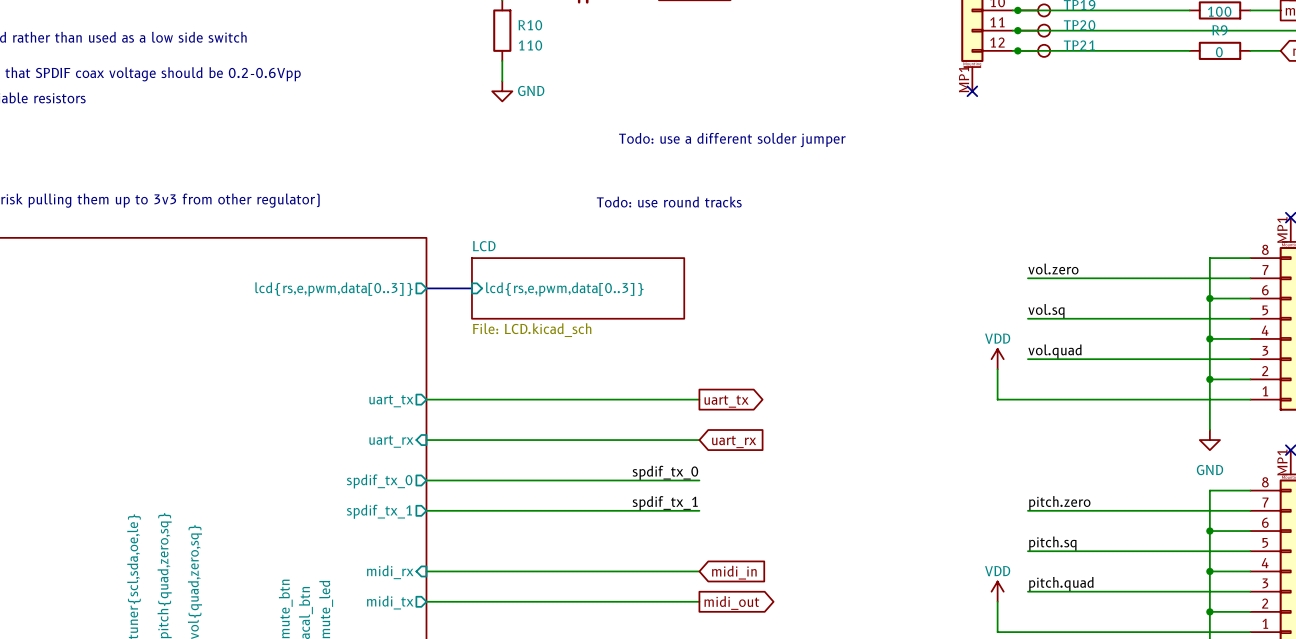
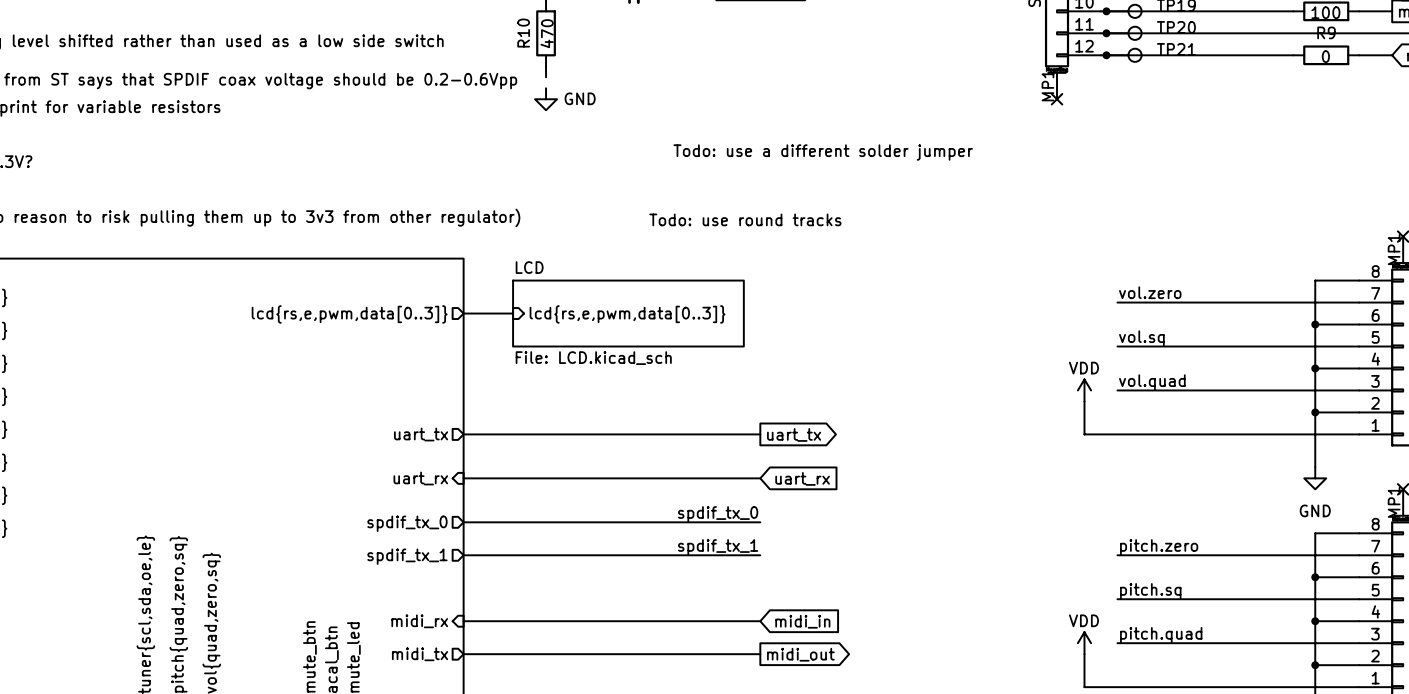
R10 name rotation: 0° (530, 25) -> 90° counterclockwise (523, 33)
R10 name position: R10 (530, 25) -> R10 (523, 33)
R10 value: 110 (530, 45) -> 470 (547, 33)
wire: (502, 71) (502, 81) -> none

